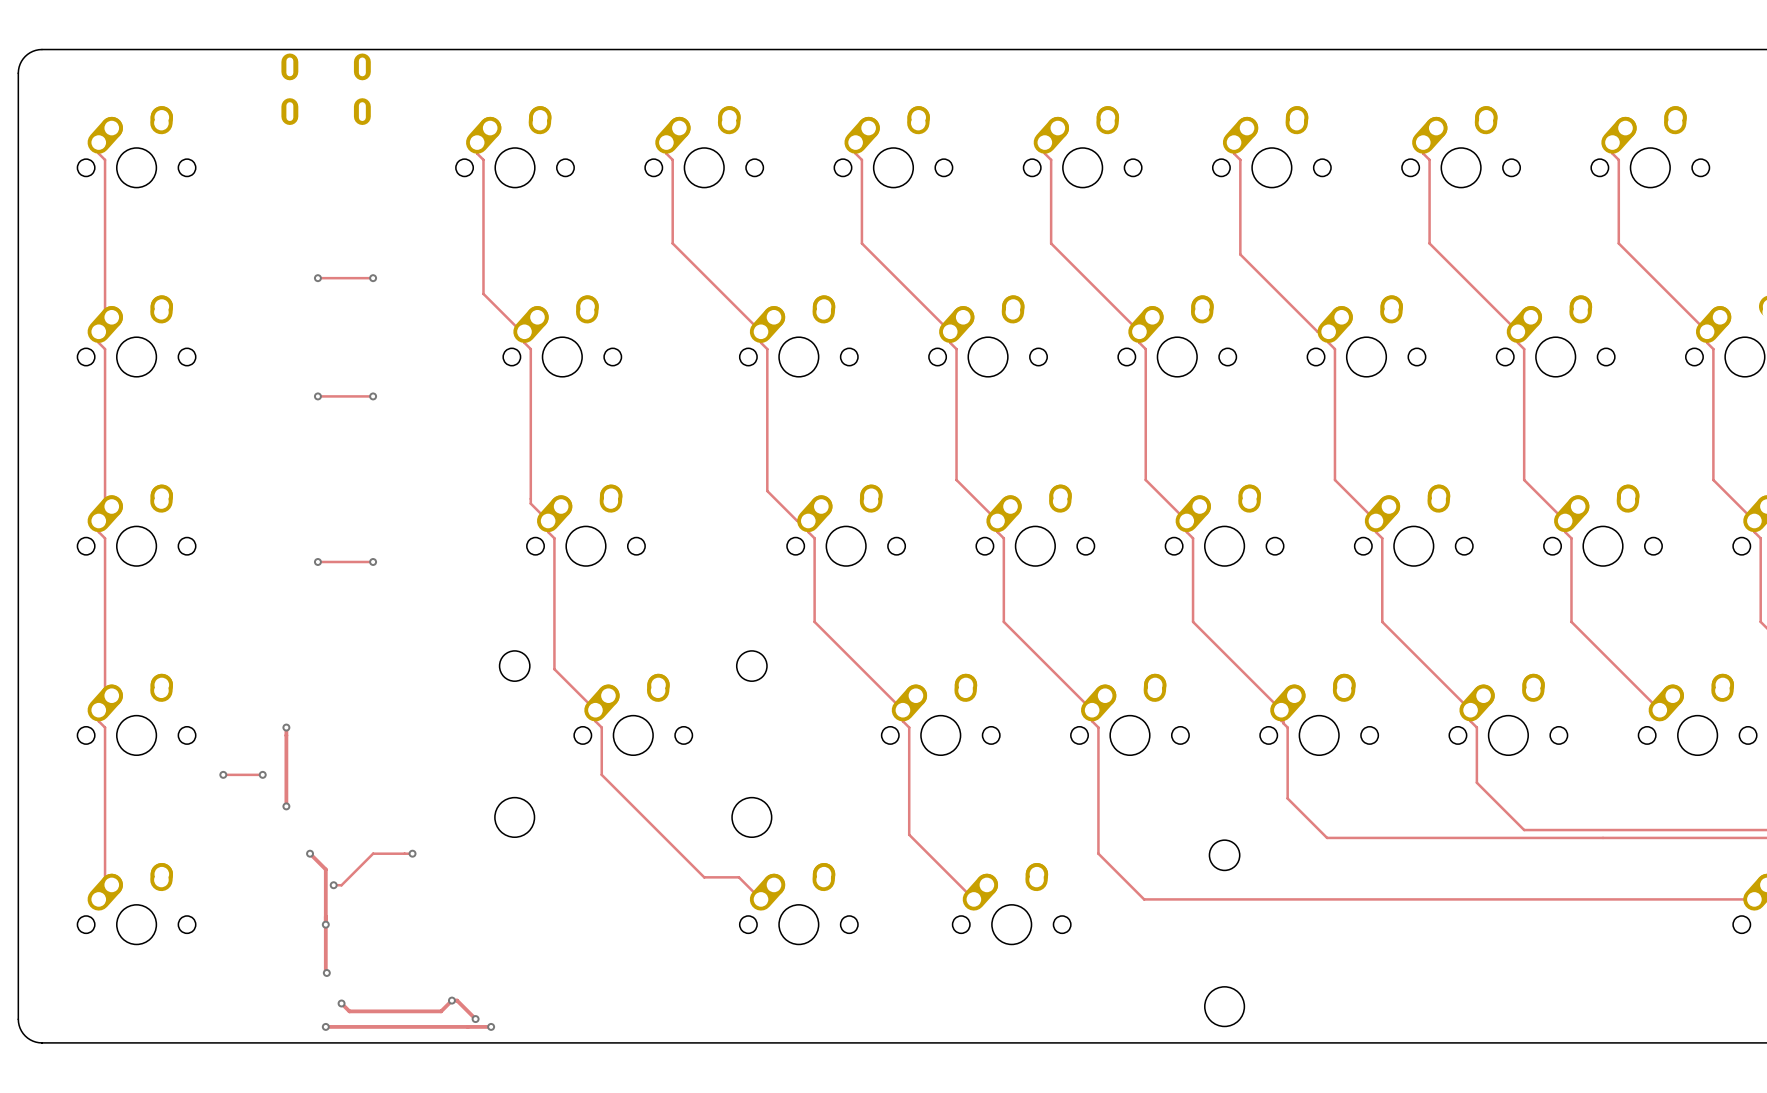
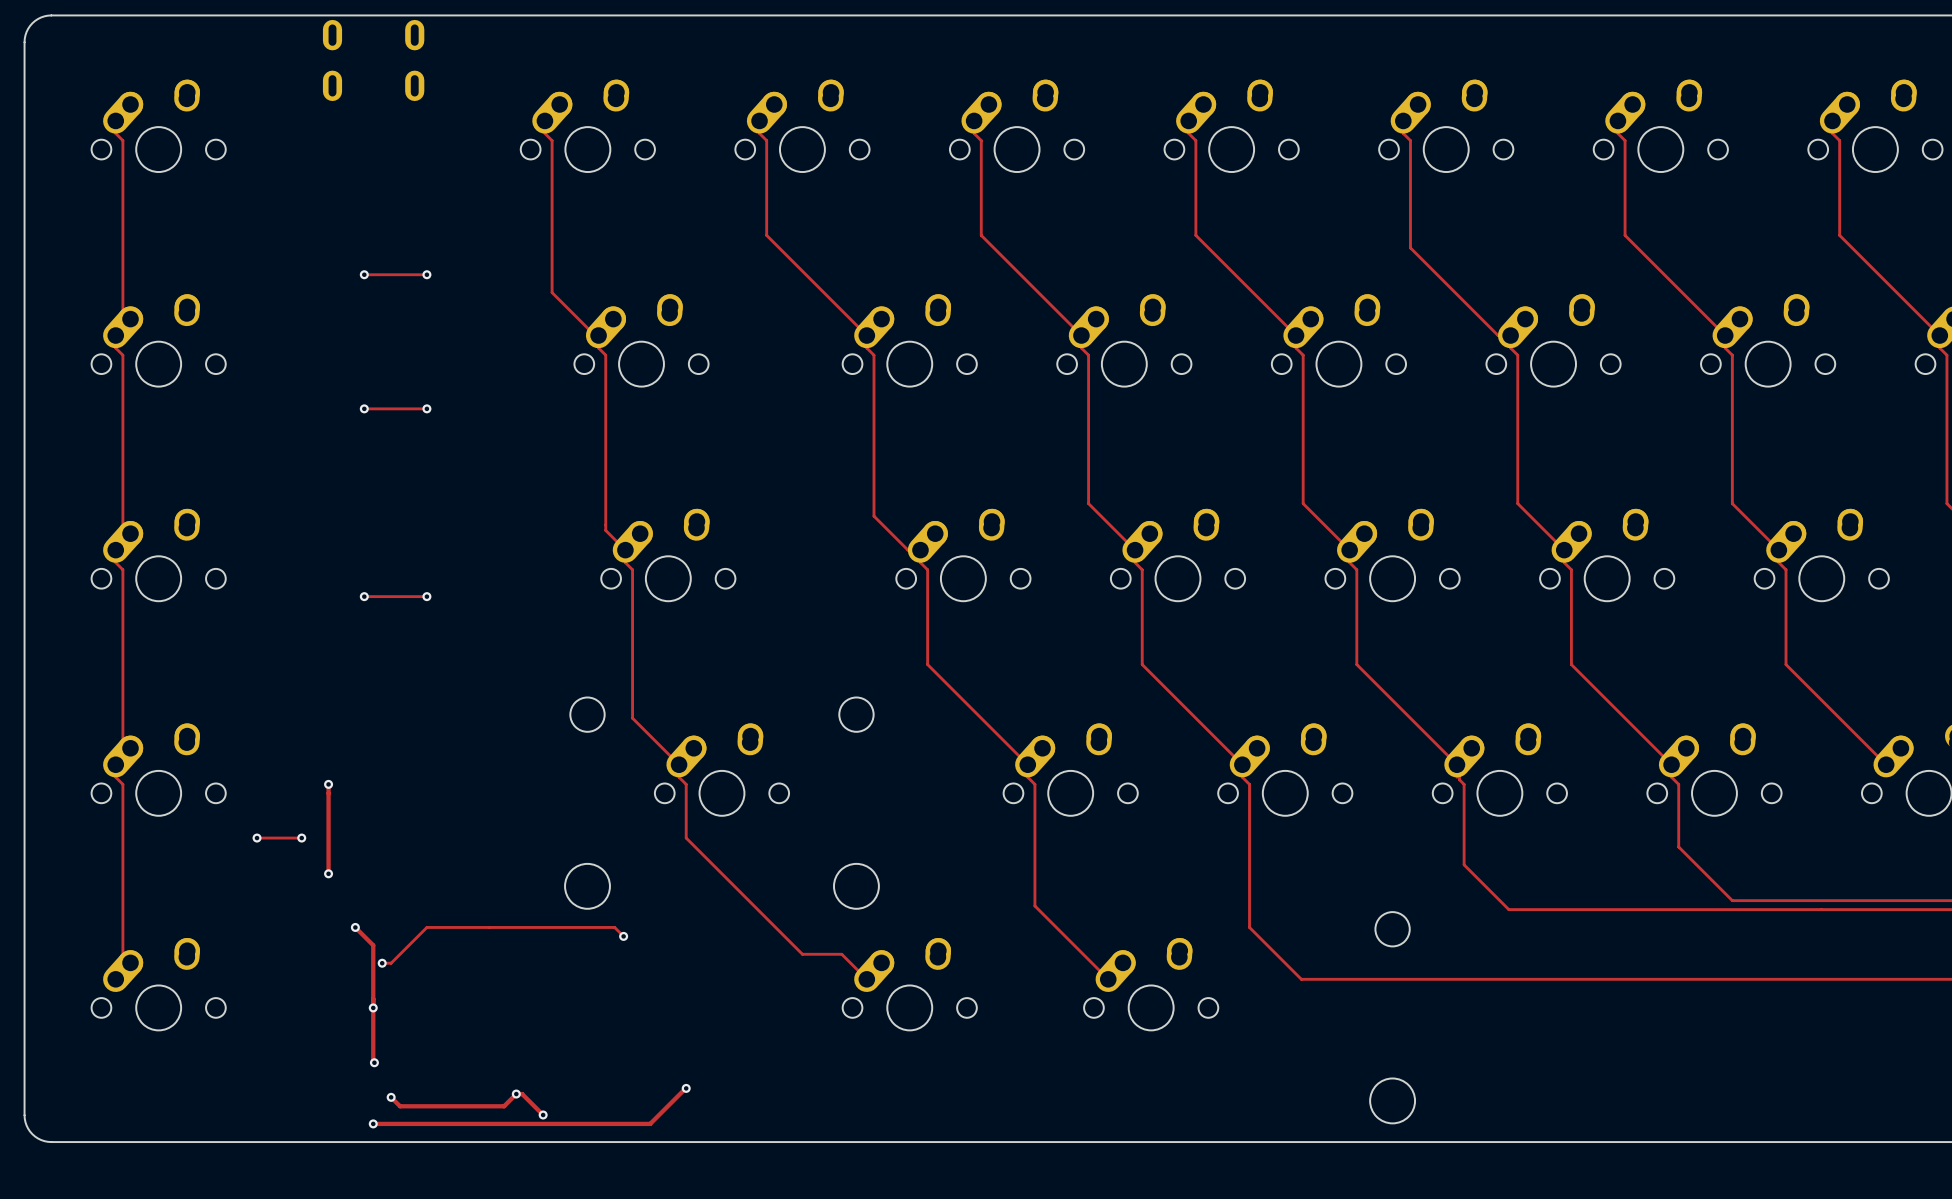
track: none -> (471, 927) (614, 927) (623, 936)
via: (412, 853) -> none
via: none -> (623, 936)
track: none -> (686, 1088) (650, 1123) (560, 1123)
via: none -> (686, 1088)
via: (491, 1026) -> none

